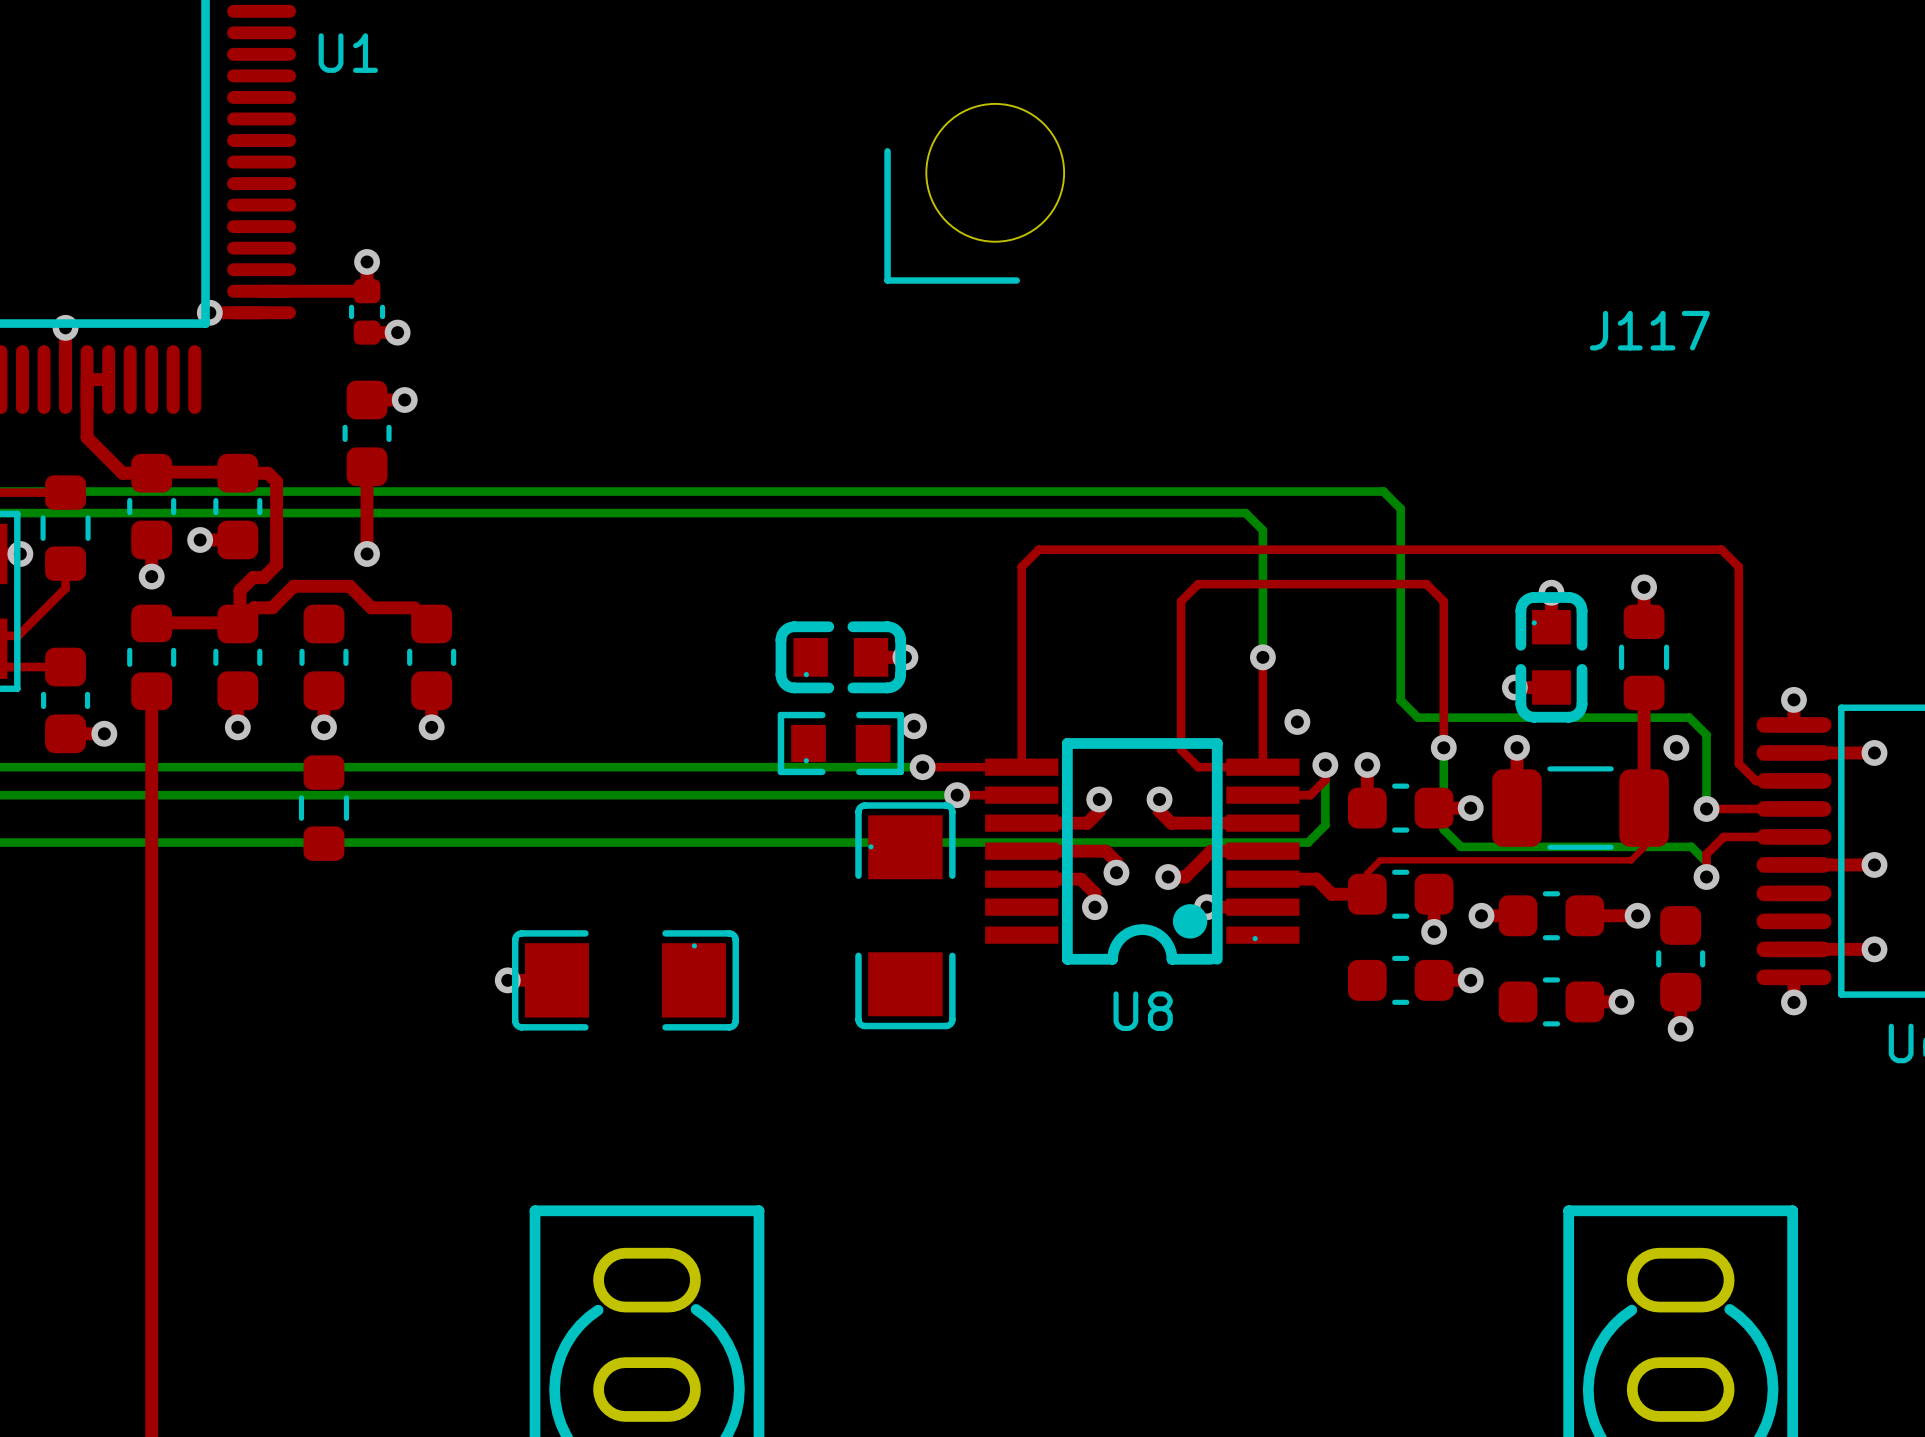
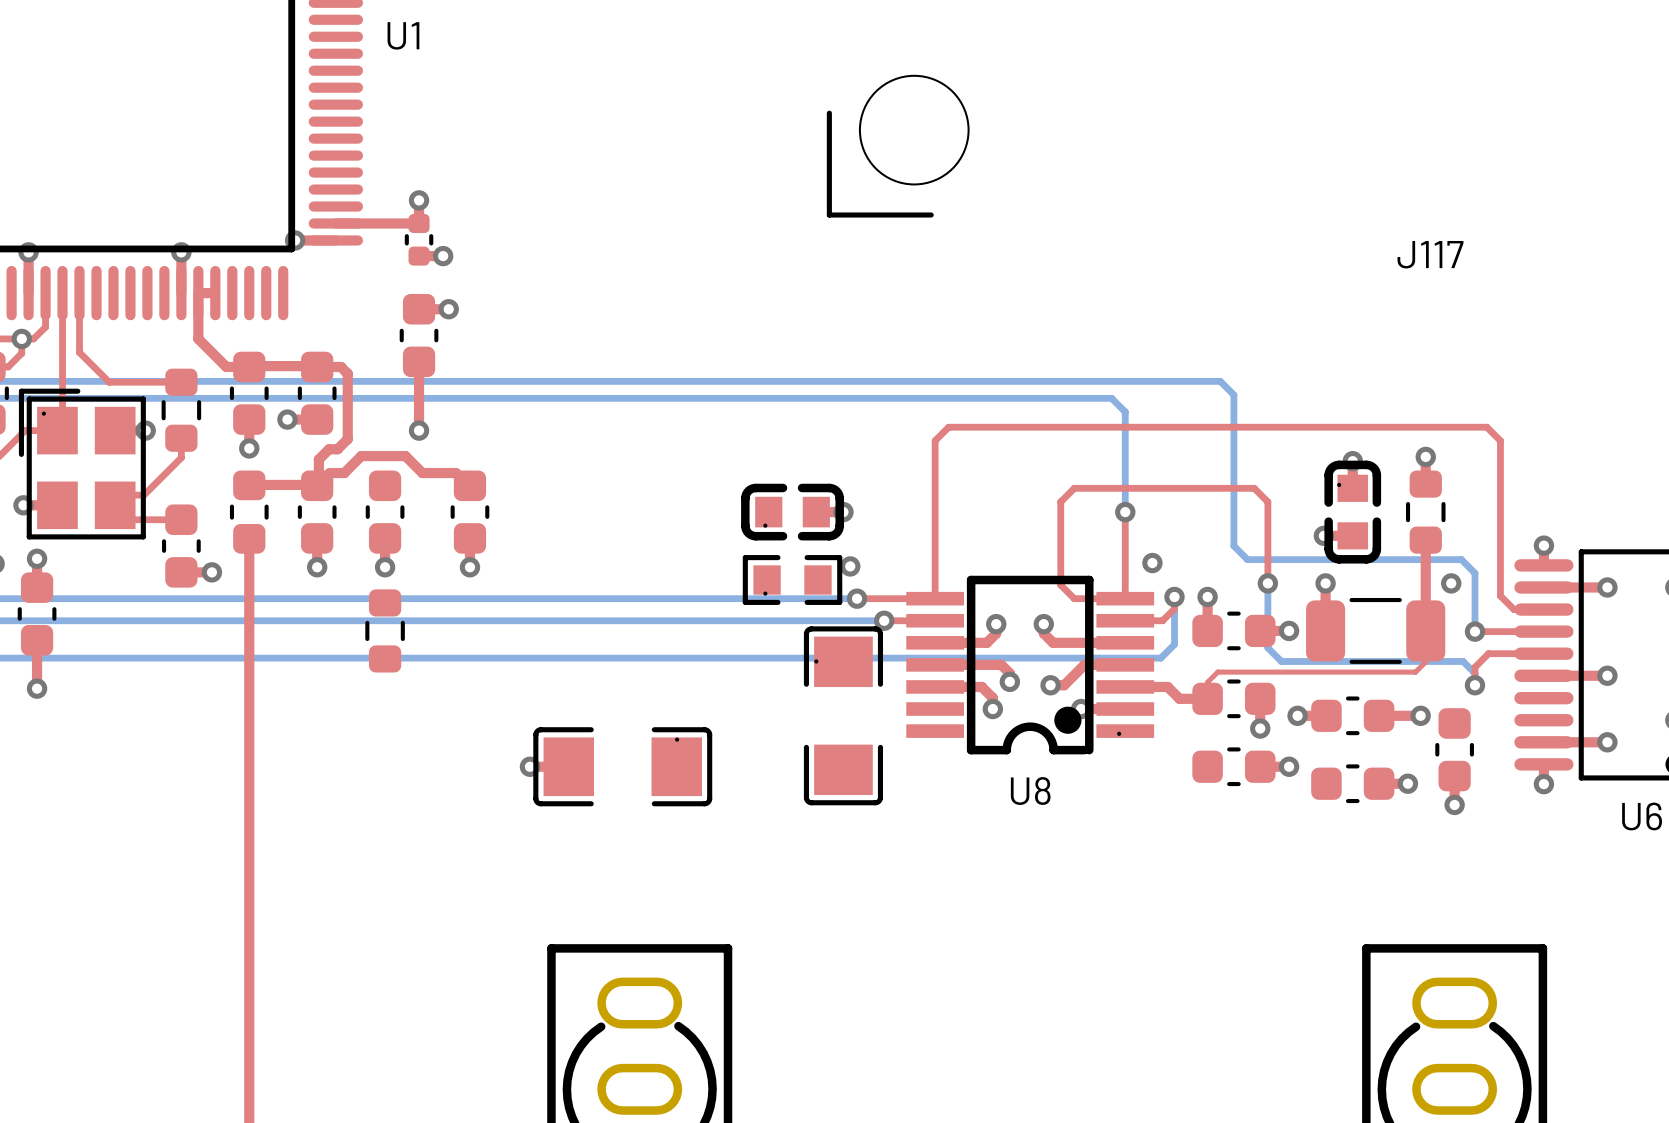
top track: (1181, 644) (1181, 601) (1198, 584) (1426, 584) (1443, 601) (1443, 644) -> (1060, 501) (1074, 488) (1254, 488) (1267, 501)

